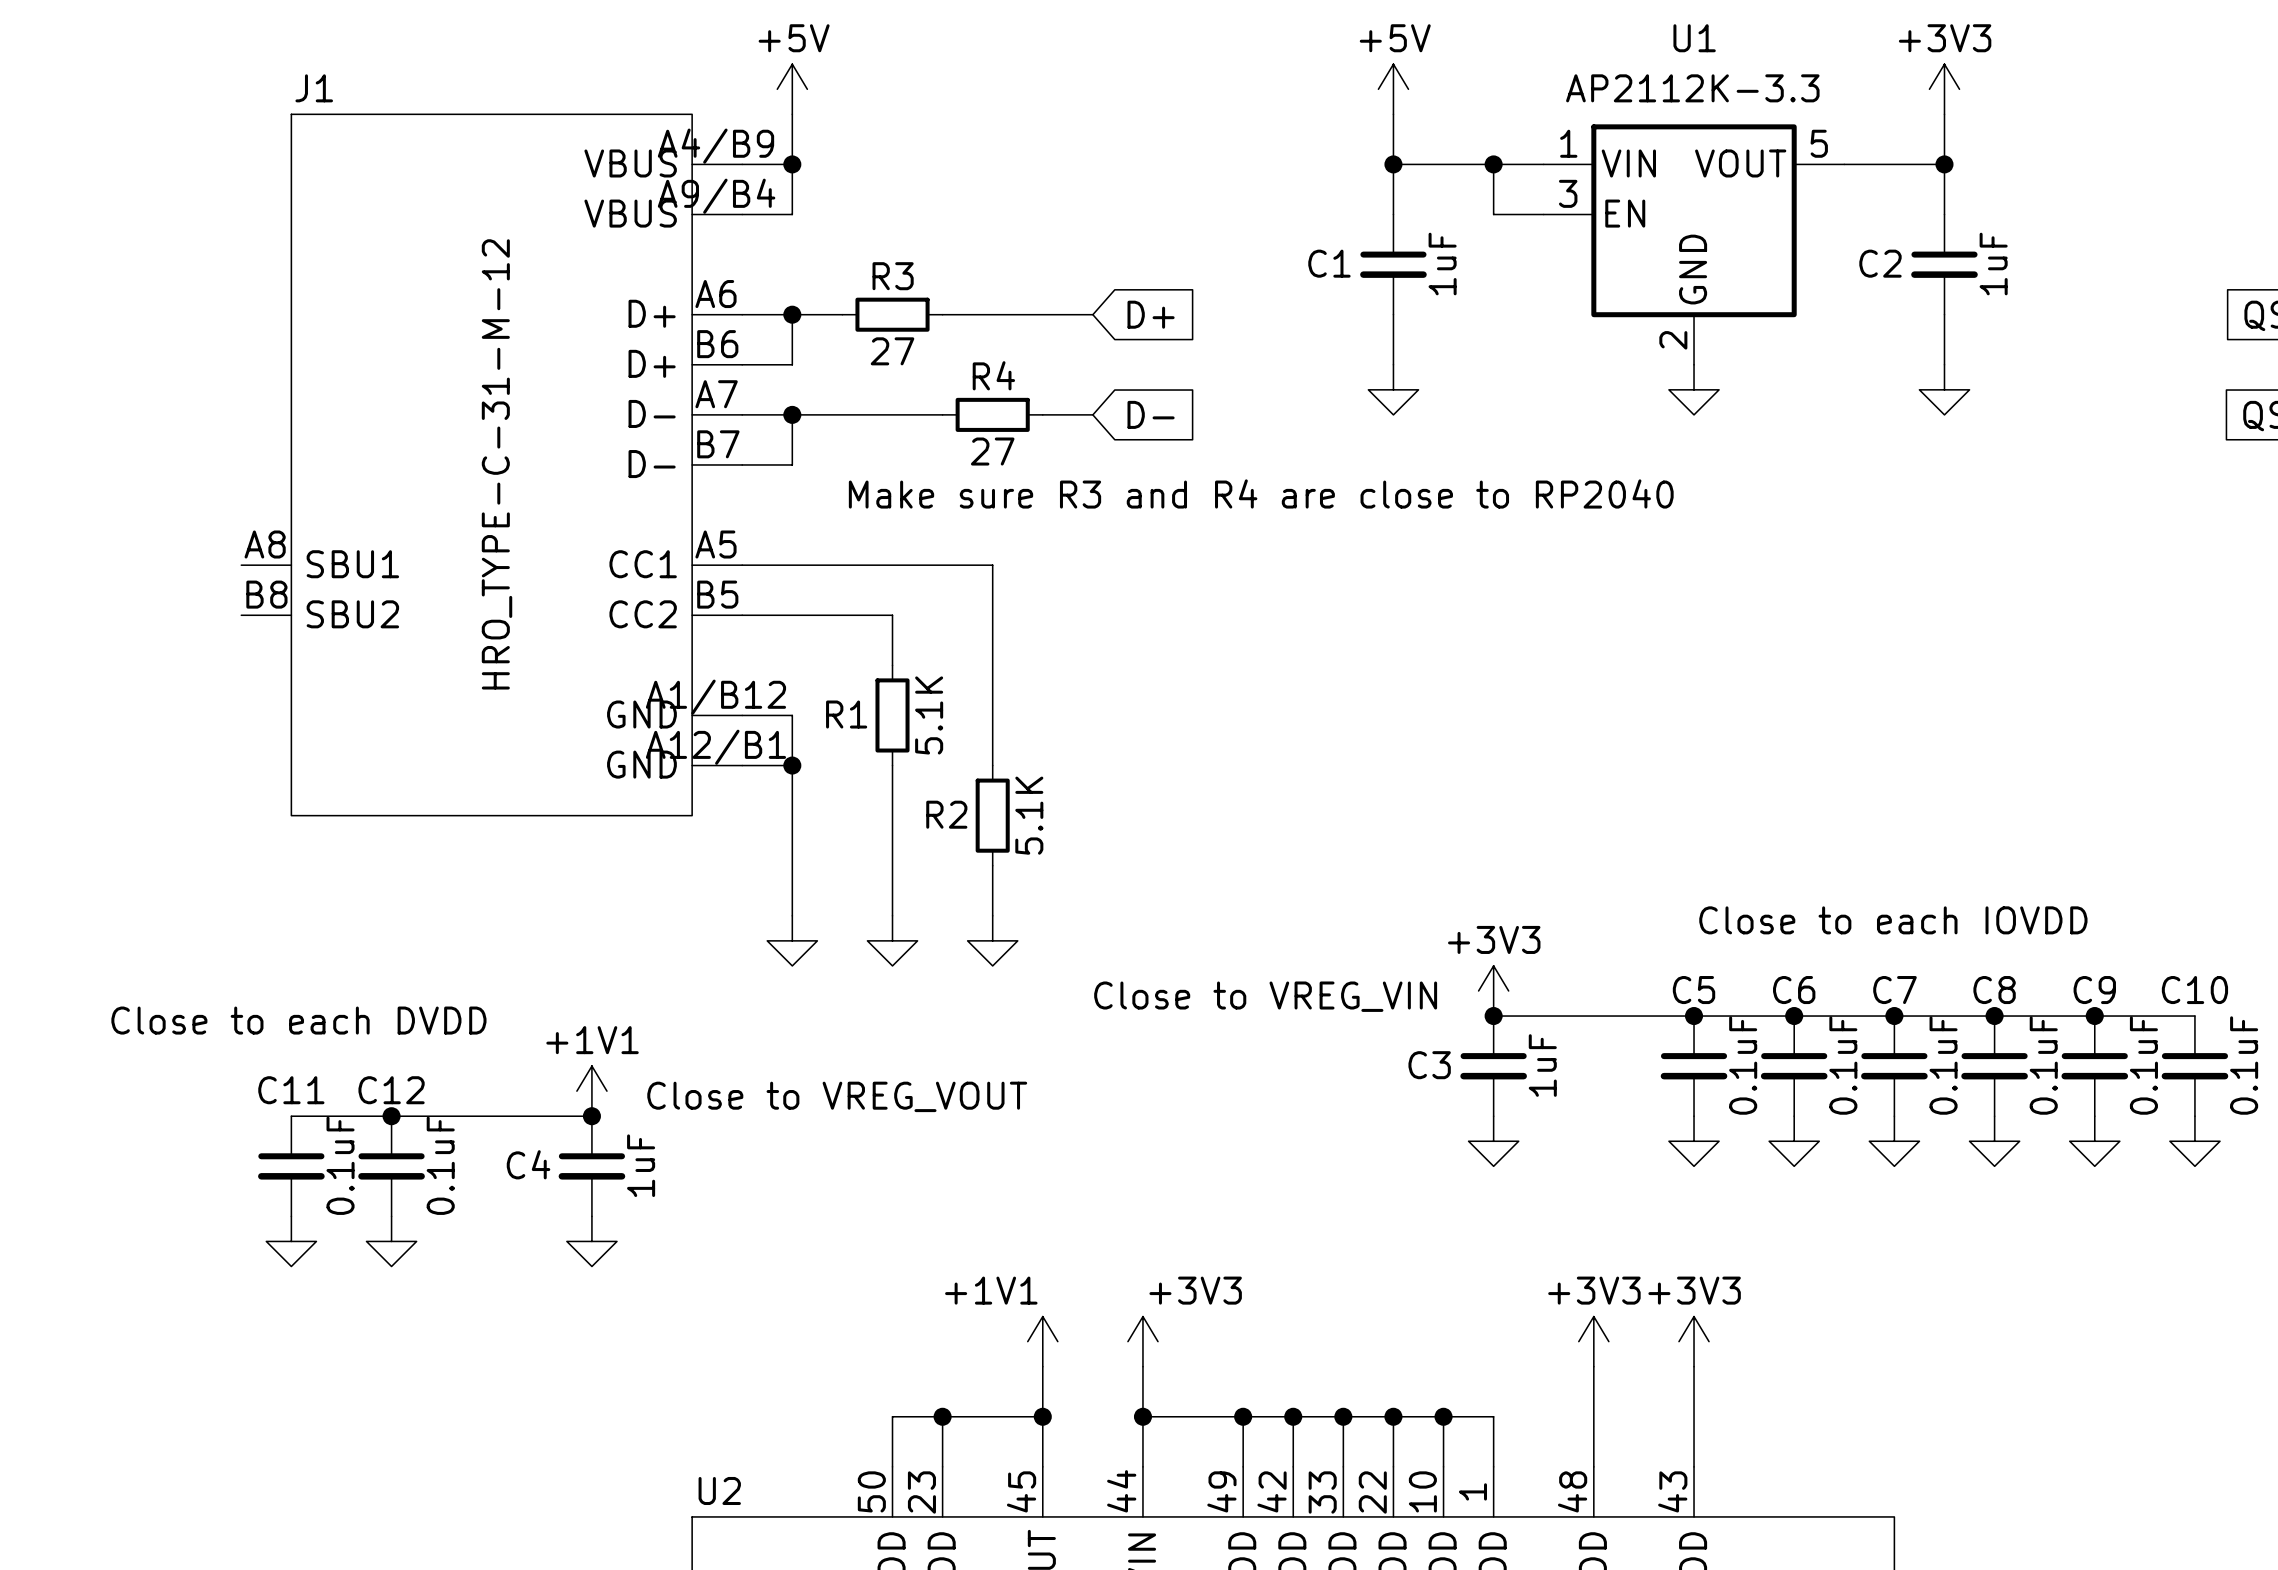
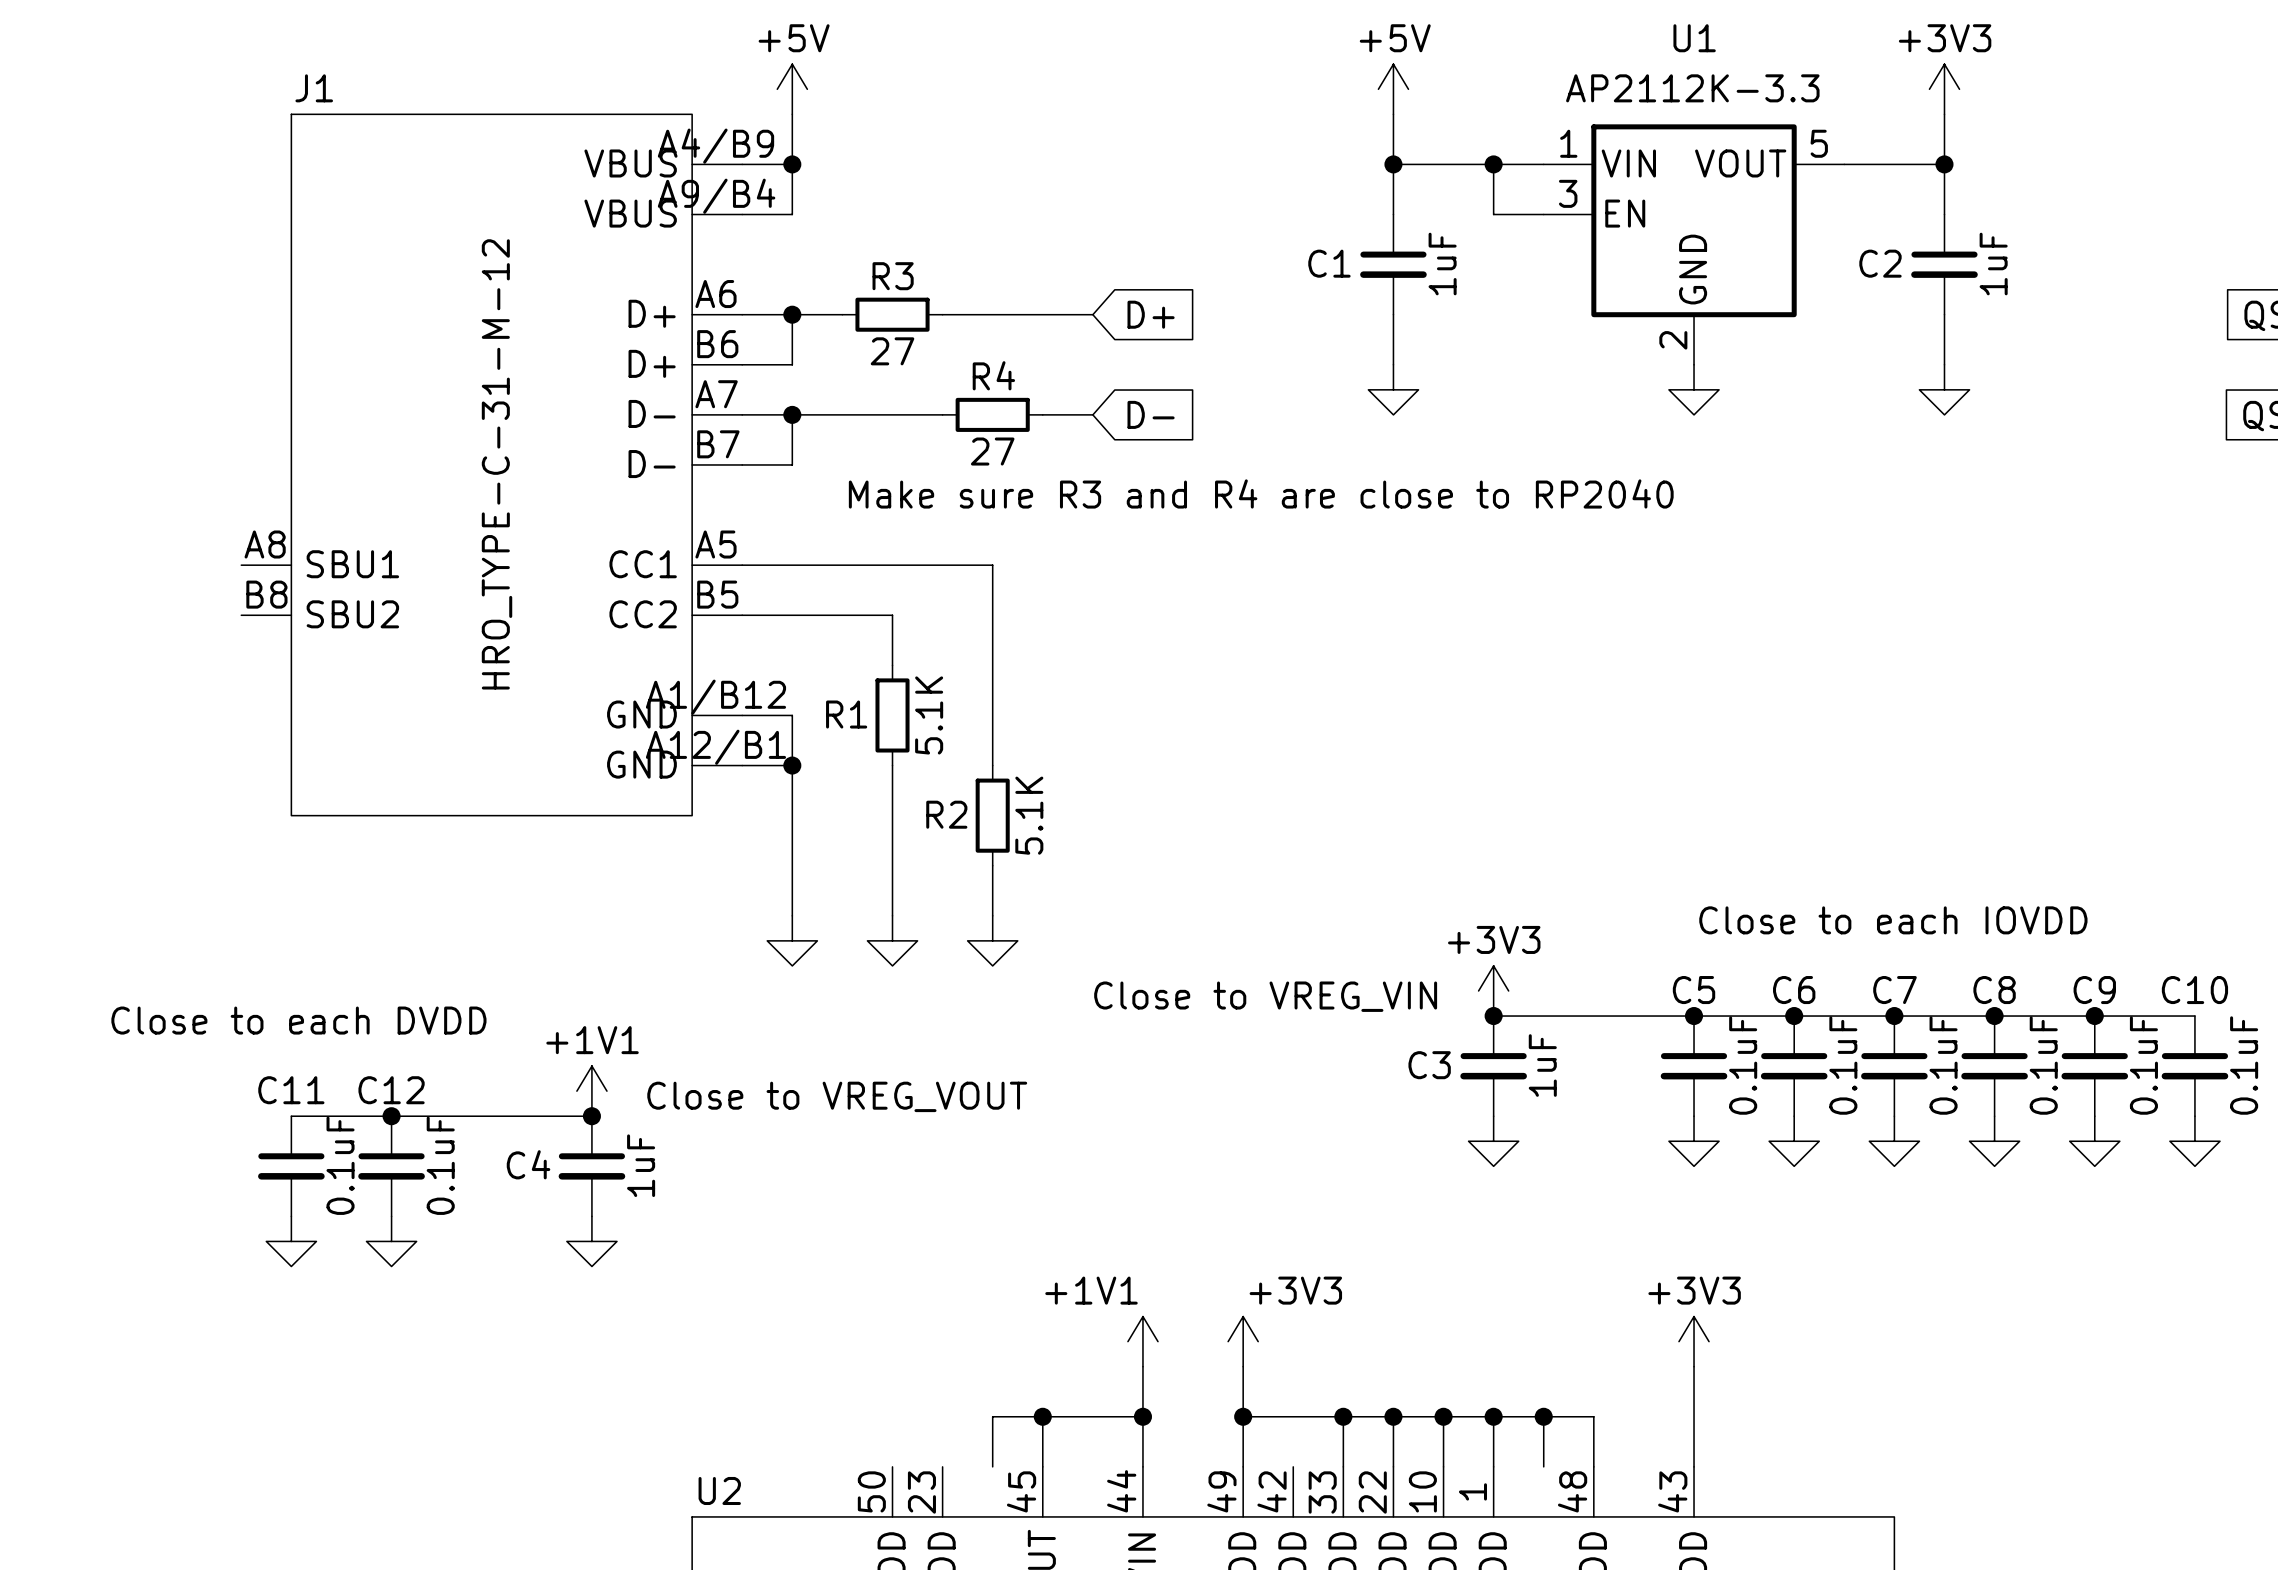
power symbol text position: +3V3 (1594, 1290) -> +3V3 (1295, 1290)
power symbol: +1V1 (1042, 1341) -> none
power symbol: +3V3 (1142, 1341) -> +1V1 (1142, 1341)
power symbol position: +3V3 (1593, 1341) -> +3V3 (1243, 1341)
wire: (1042, 1366) (1042, 1416) -> (1142, 1416) (1042, 1416)
wire: (1593, 1366) (1593, 1416) -> (1493, 1416) (1593, 1416)
wire: (942, 1416) (942, 1466) -> none
junction: (942, 1416) -> none
wire: (992, 1416) (892, 1416) (892, 1466) -> (992, 1416) (992, 1466)
wire: (1142, 1416) (1243, 1416) -> (1243, 1366) (1243, 1416)
wire: (1293, 1416) (1293, 1466) -> (1543, 1416) (1543, 1466)
junction: (1293, 1416) -> none
junction: none -> (1493, 1416)
junction: none -> (1543, 1416)

